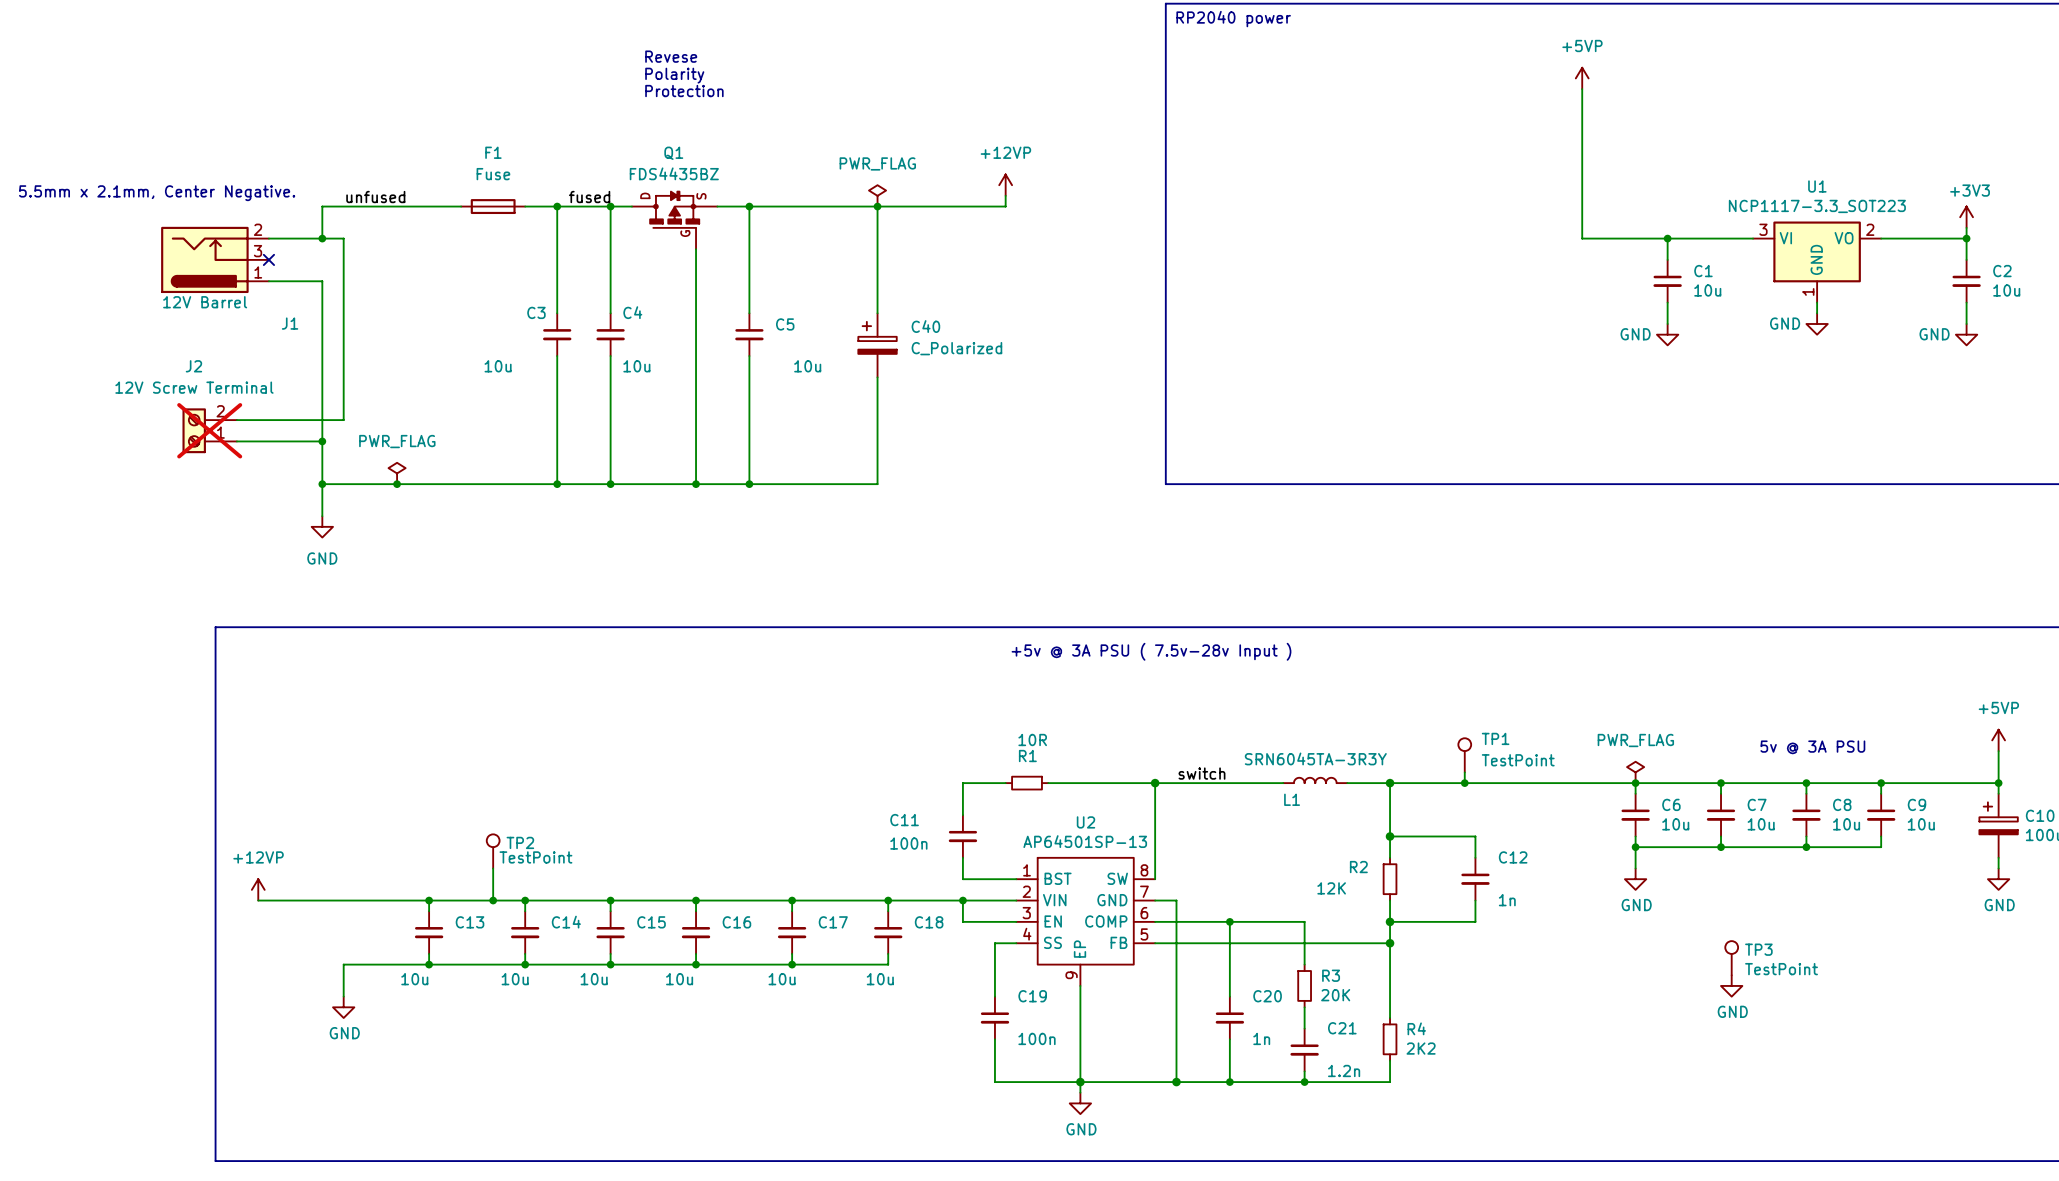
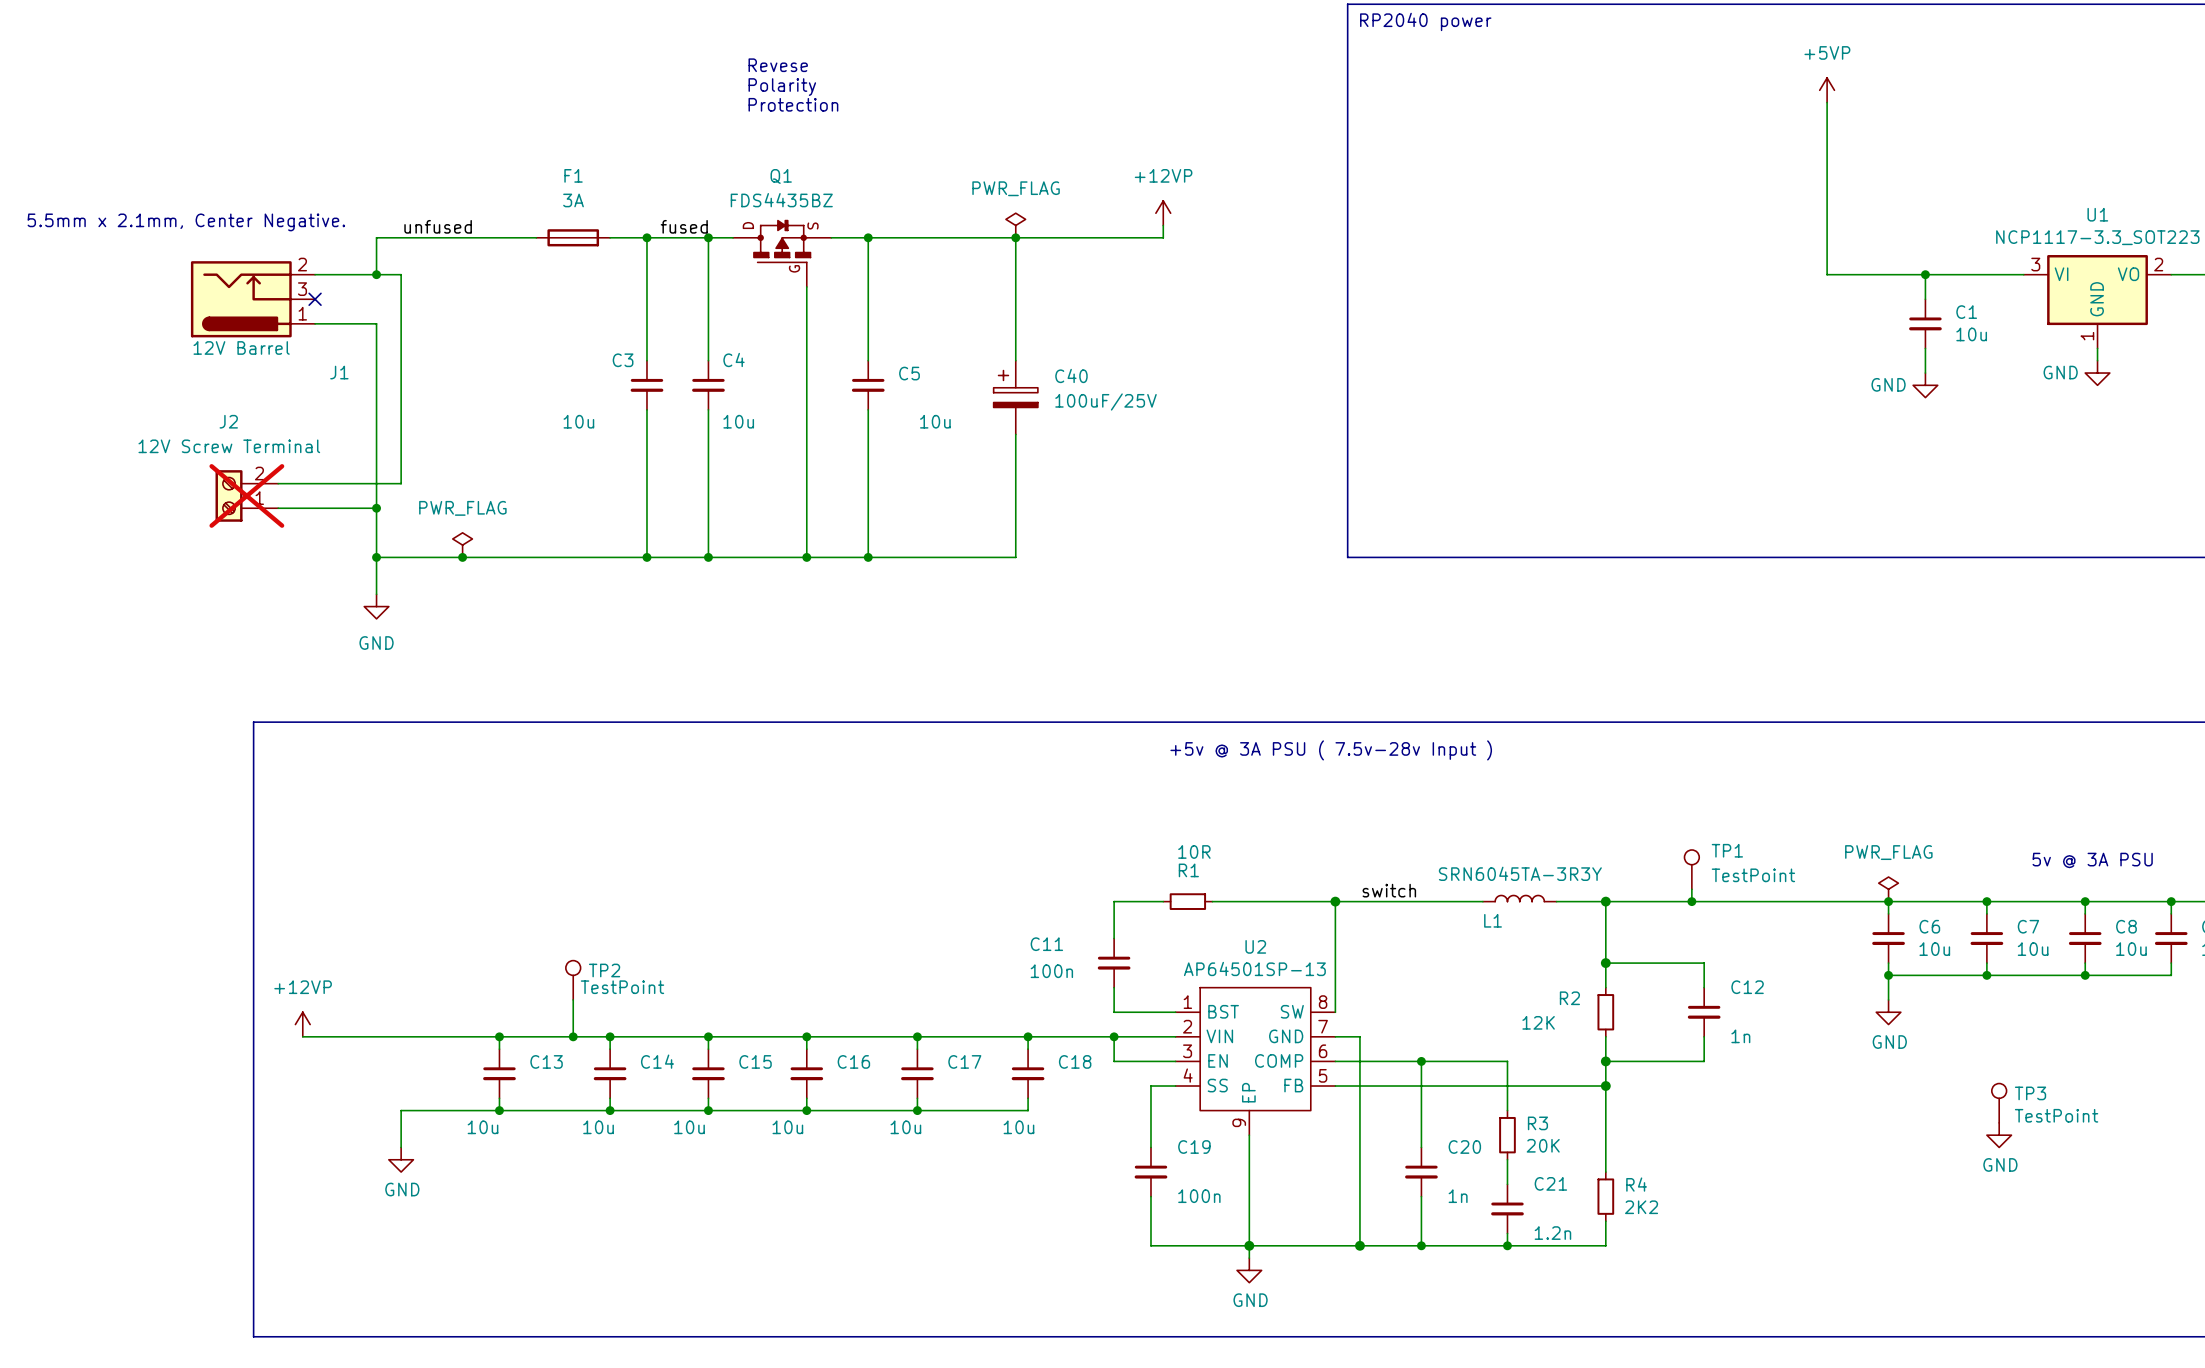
F1 value: Fuse (493, 174) -> 3A (573, 200)
C40 value: C_Polarized (956, 348) -> 100uF/25V (1106, 402)

